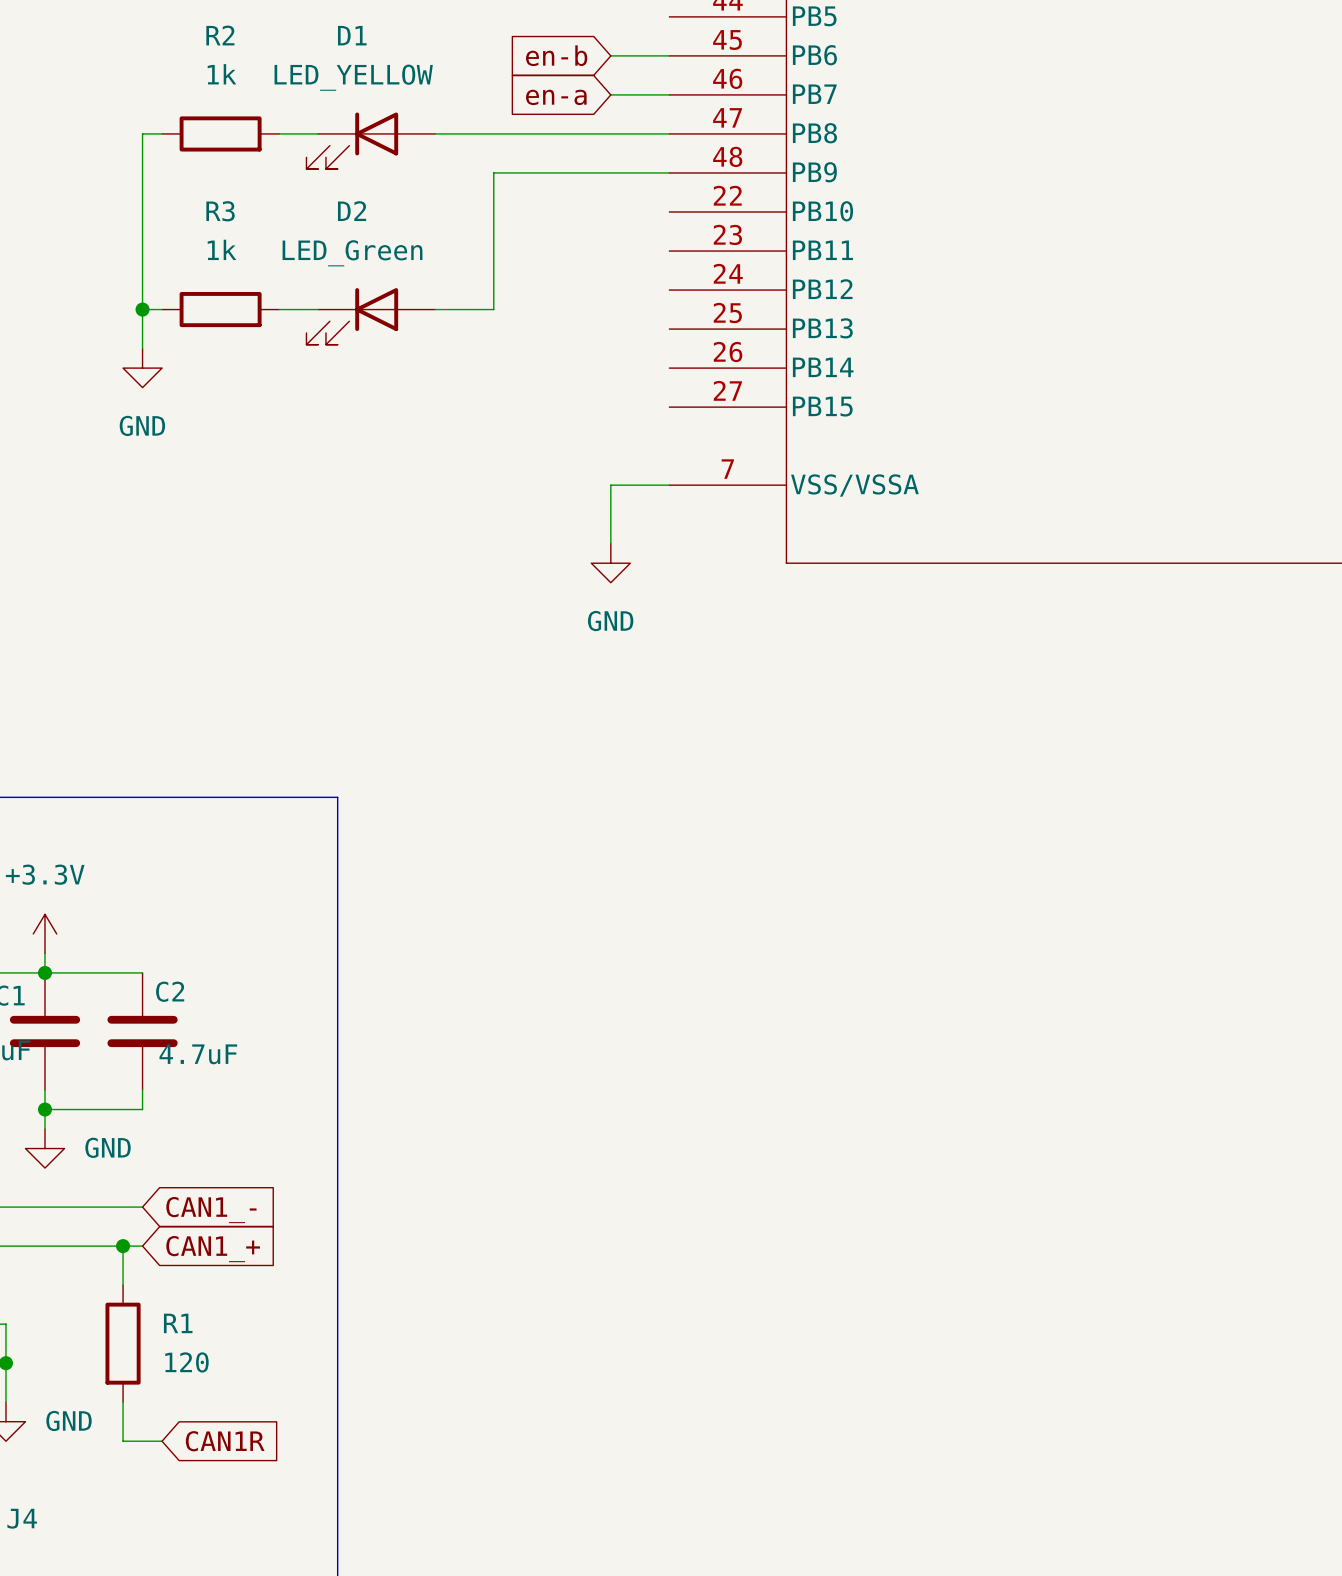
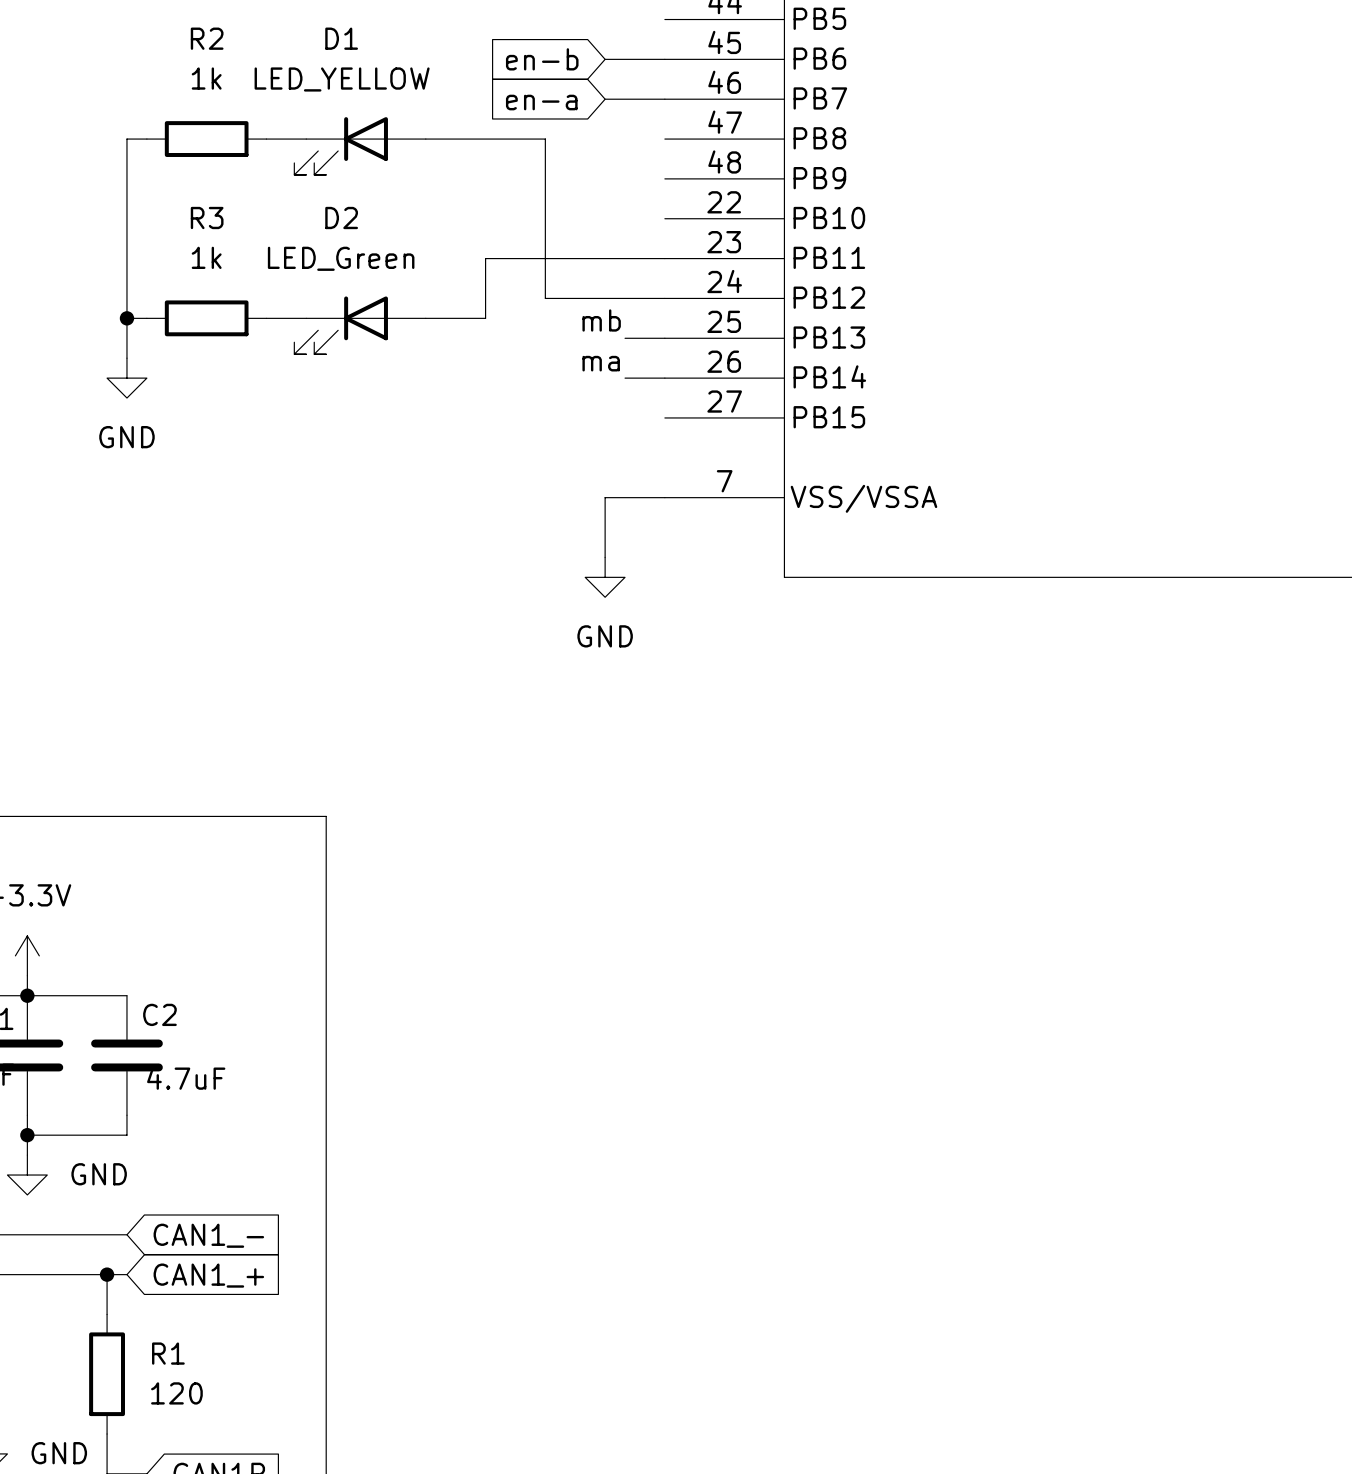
wire: (552, 133) (669, 133) -> (545, 139) (545, 298) (664, 298)
wire: (669, 172) (493, 172) (493, 251) -> (664, 258) (485, 258)
label: none -> mb (601, 320)
wire: none -> (625, 338) (664, 338)
label: none -> ma (601, 363)
wire: none -> (625, 378) (664, 378)

